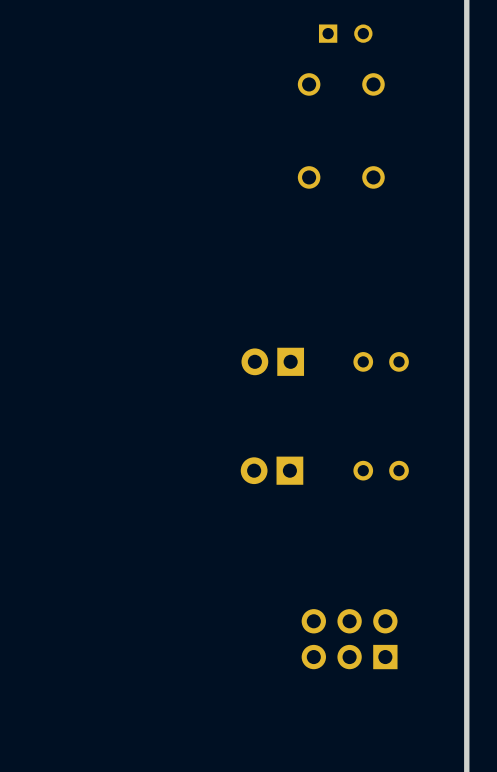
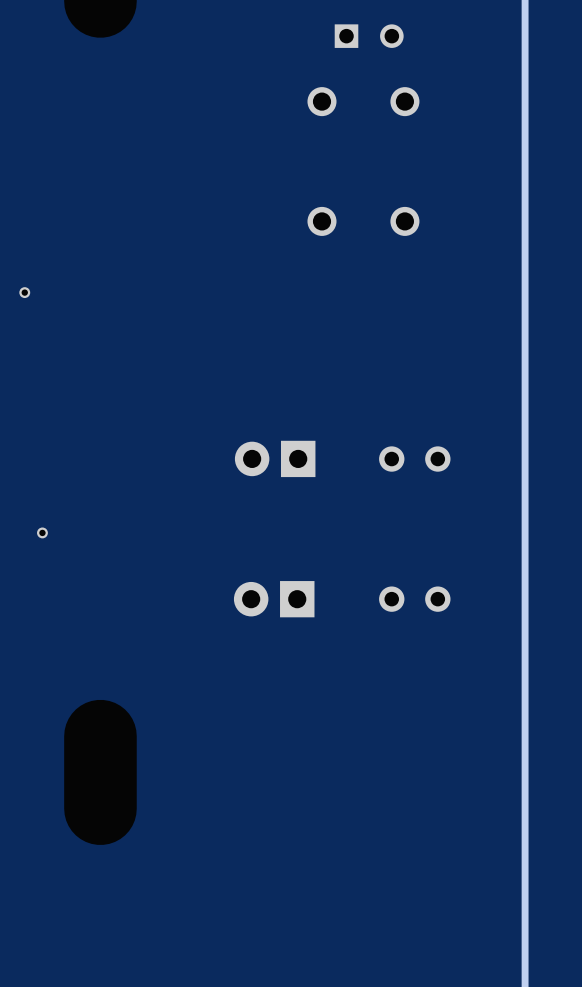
part: none -> (24, 292)
part: none -> (42, 532)
part: (349, 639) -> none

